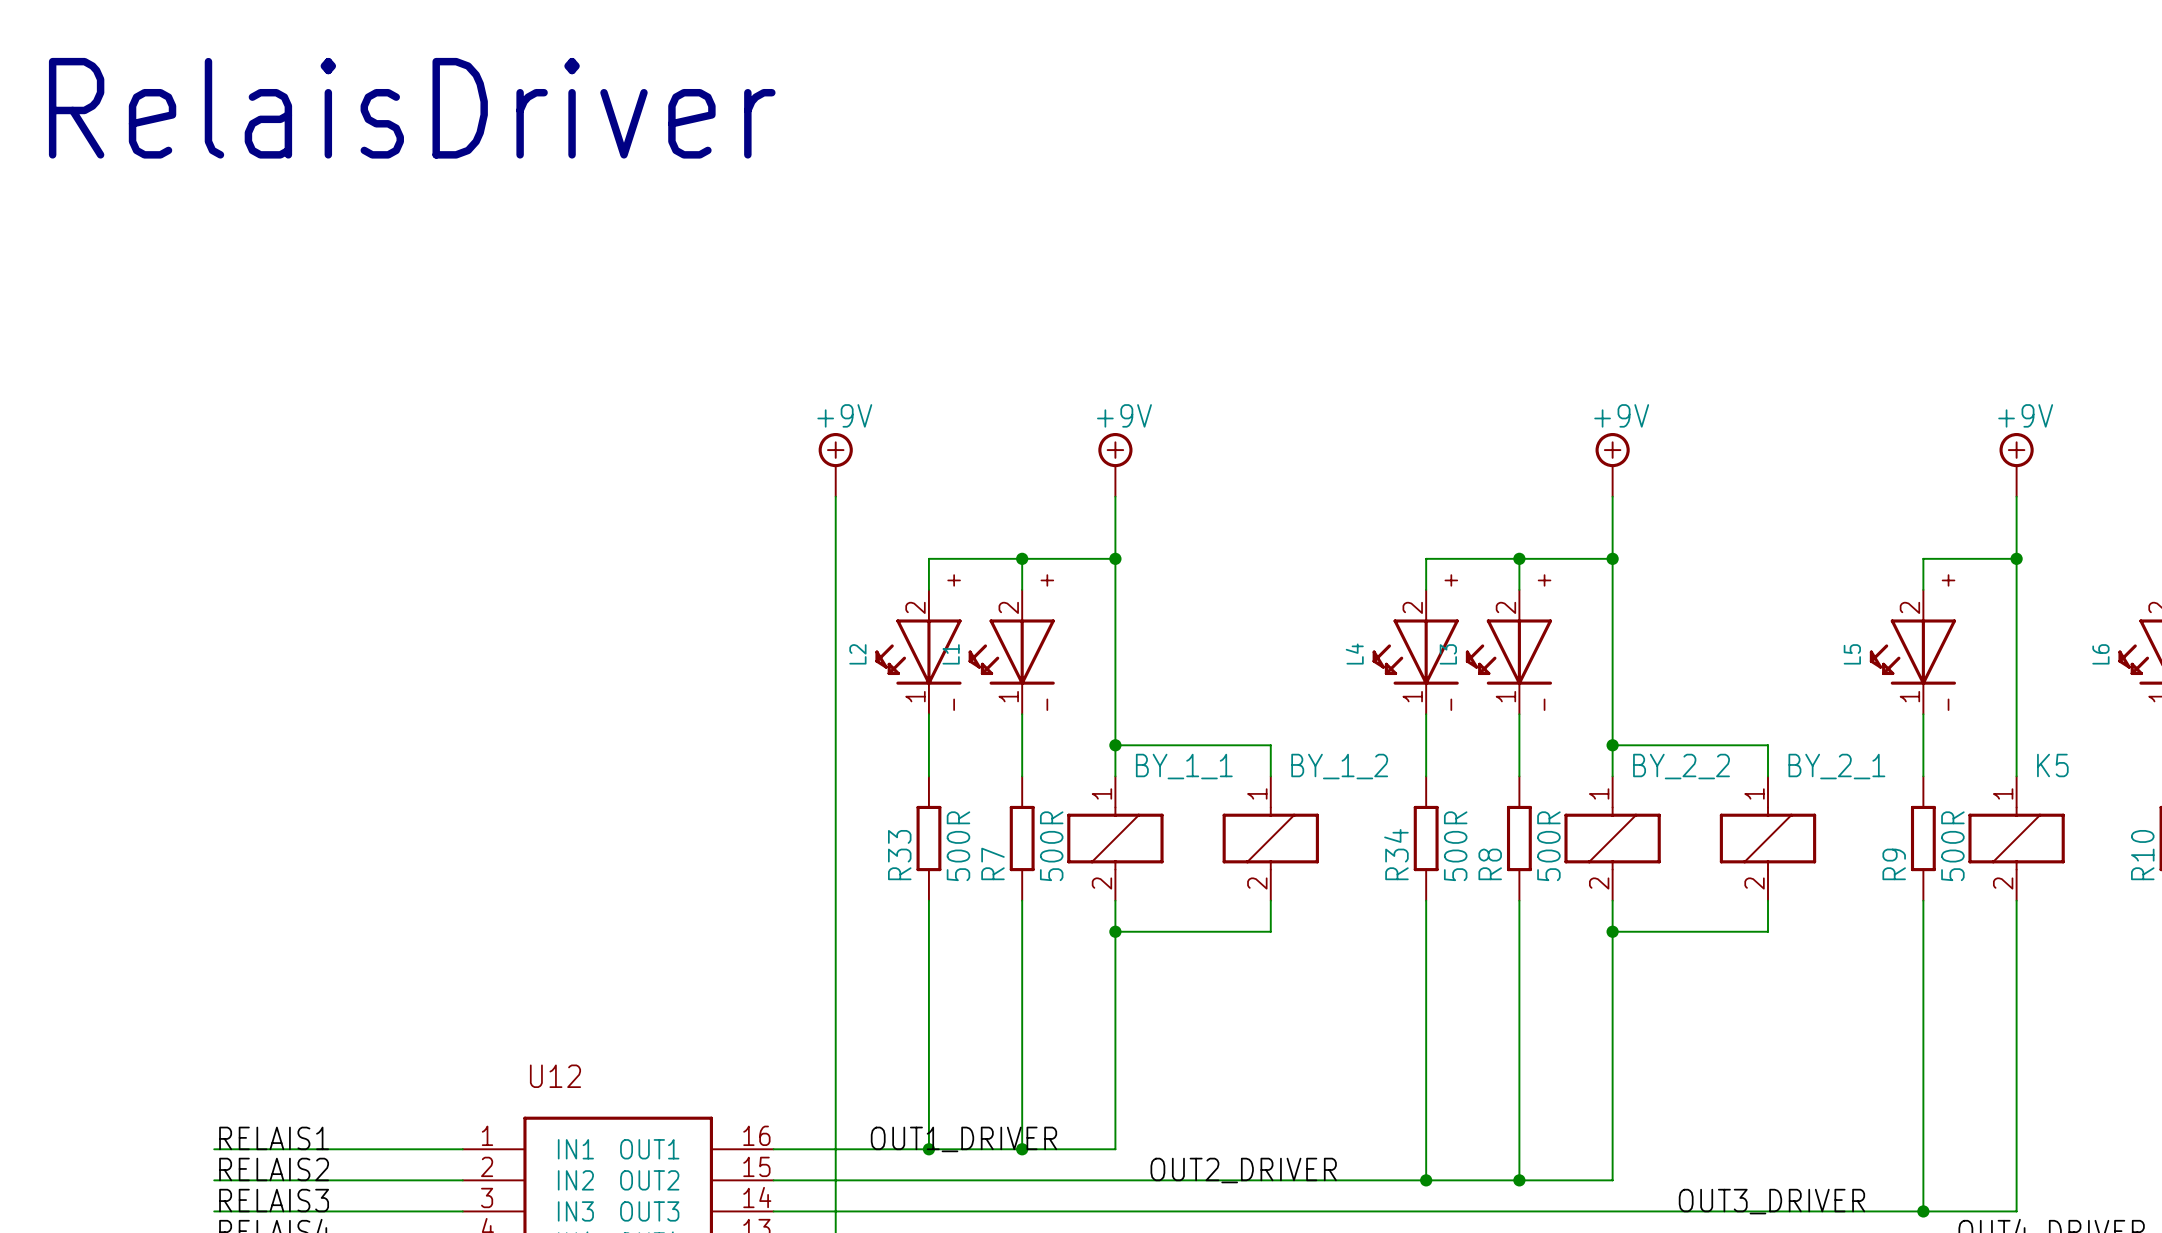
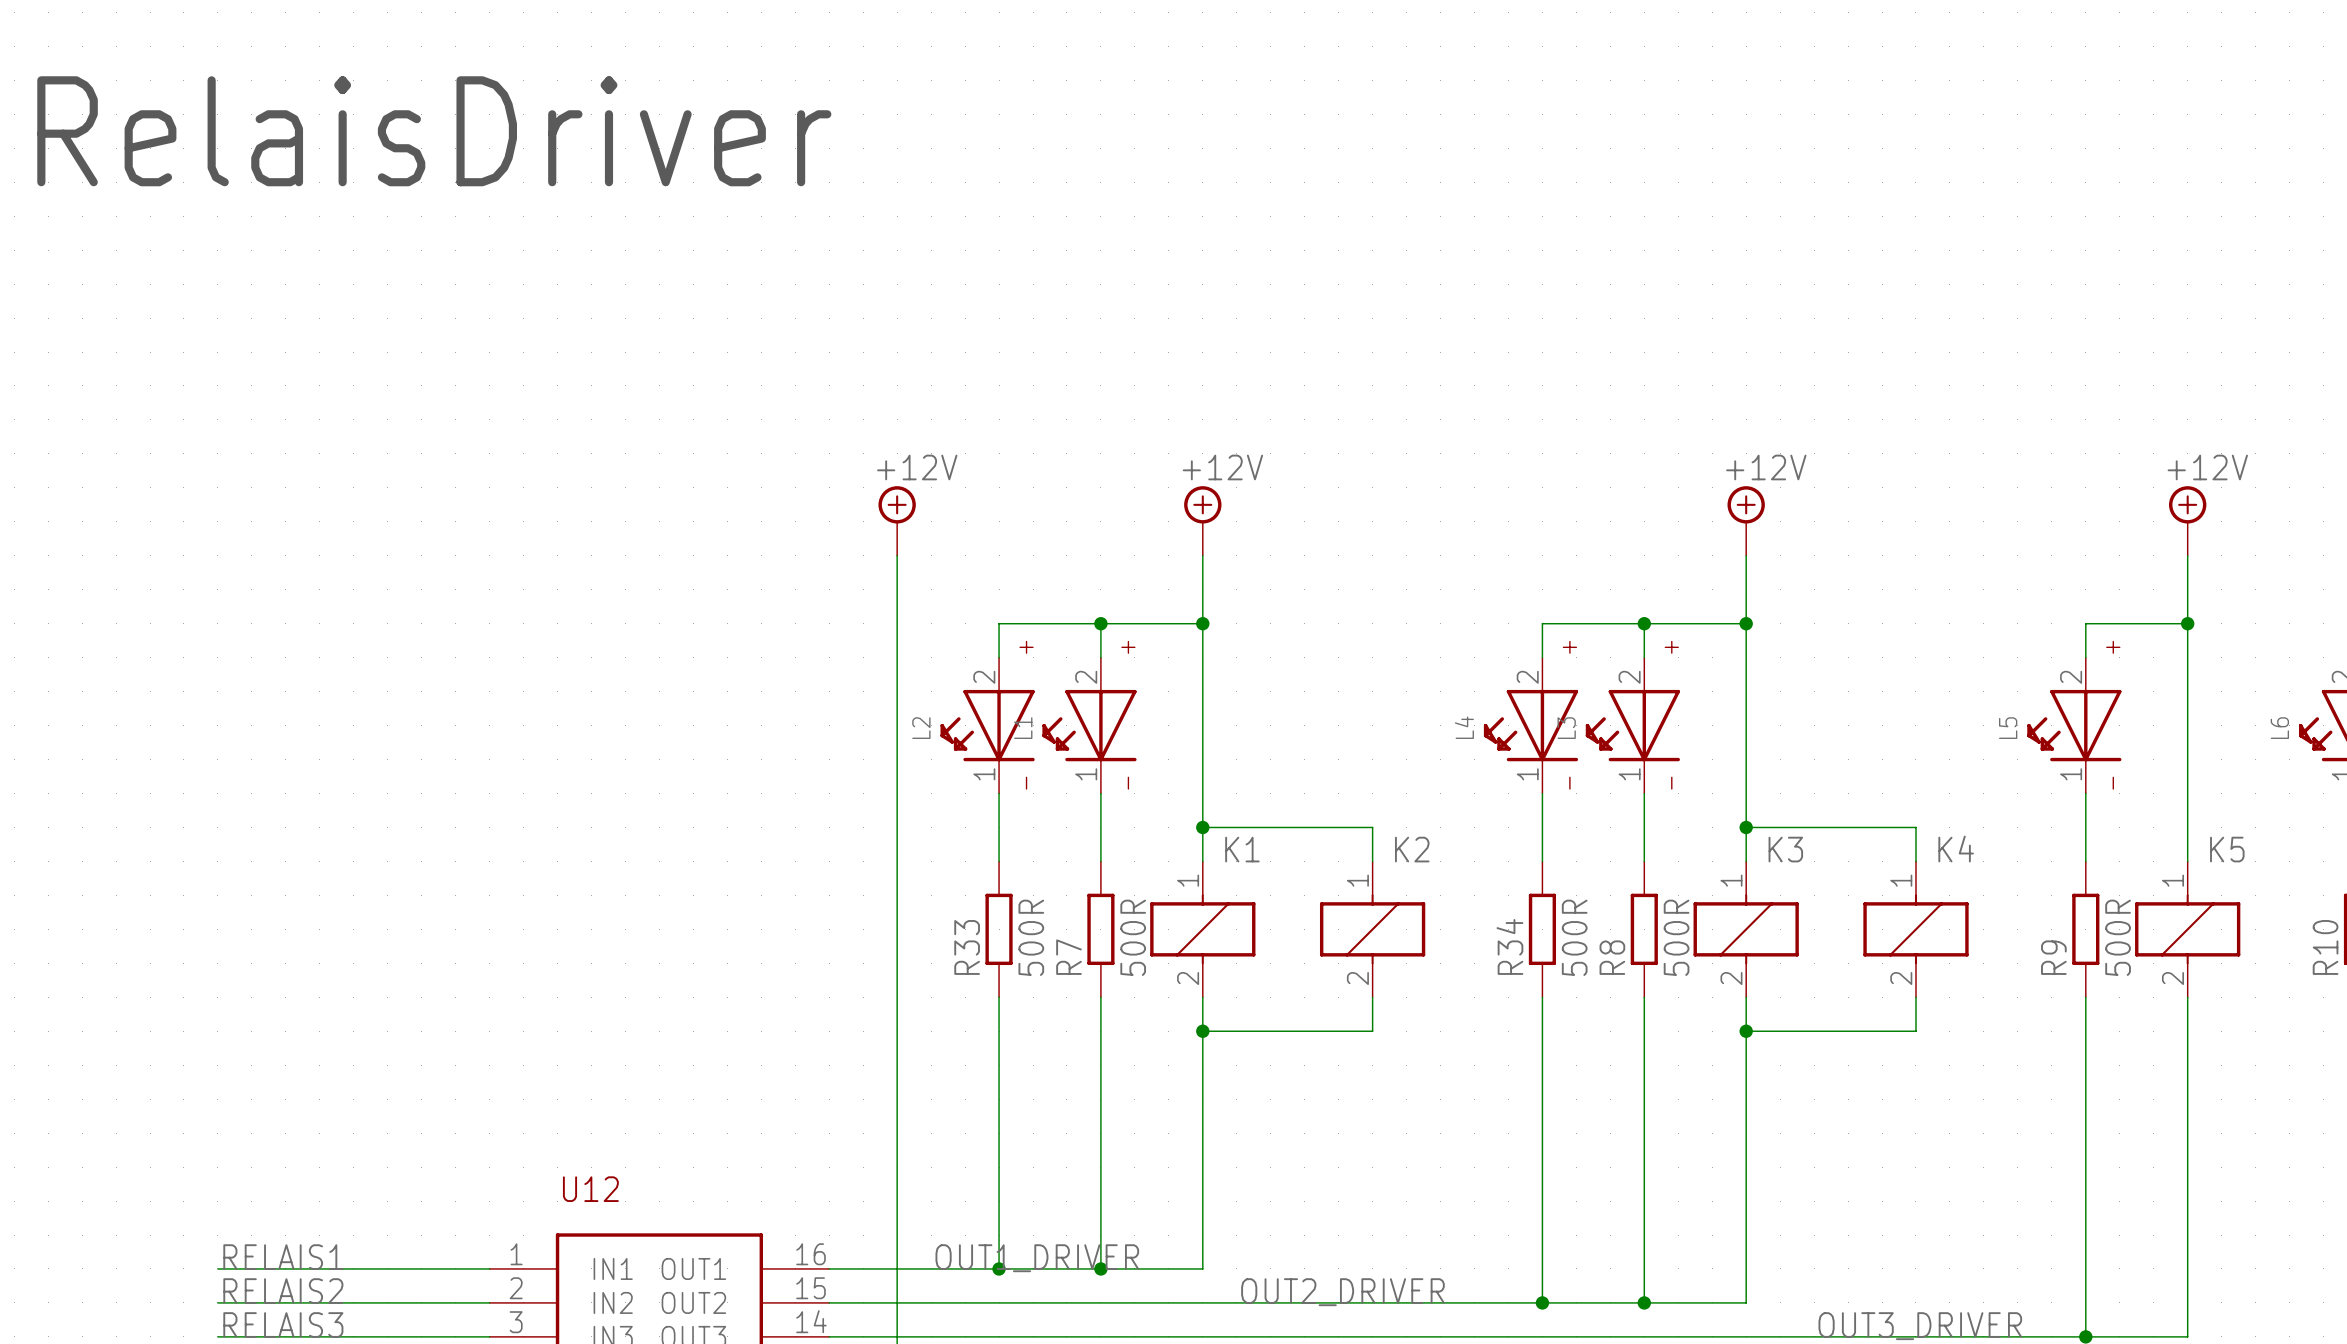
power symbol: +9V (835, 464) -> +12V (897, 520)
power symbol: +9V (1115, 464) -> +12V (1202, 520)
power symbol: +9V (1612, 464) -> +12V (1746, 520)
power symbol: +9V (2016, 464) -> +12V (2187, 520)
BY_1_1 name: BY_1_1 (1184, 766) -> K1 (1242, 849)
BY_1_2 name: BY_1_2 (1339, 766) -> K2 (1412, 849)
BY_2_2 name: BY_2_2 (1681, 766) -> K3 (1785, 849)
BY_2_1 name: BY_2_1 (1836, 766) -> K4 (1956, 848)

